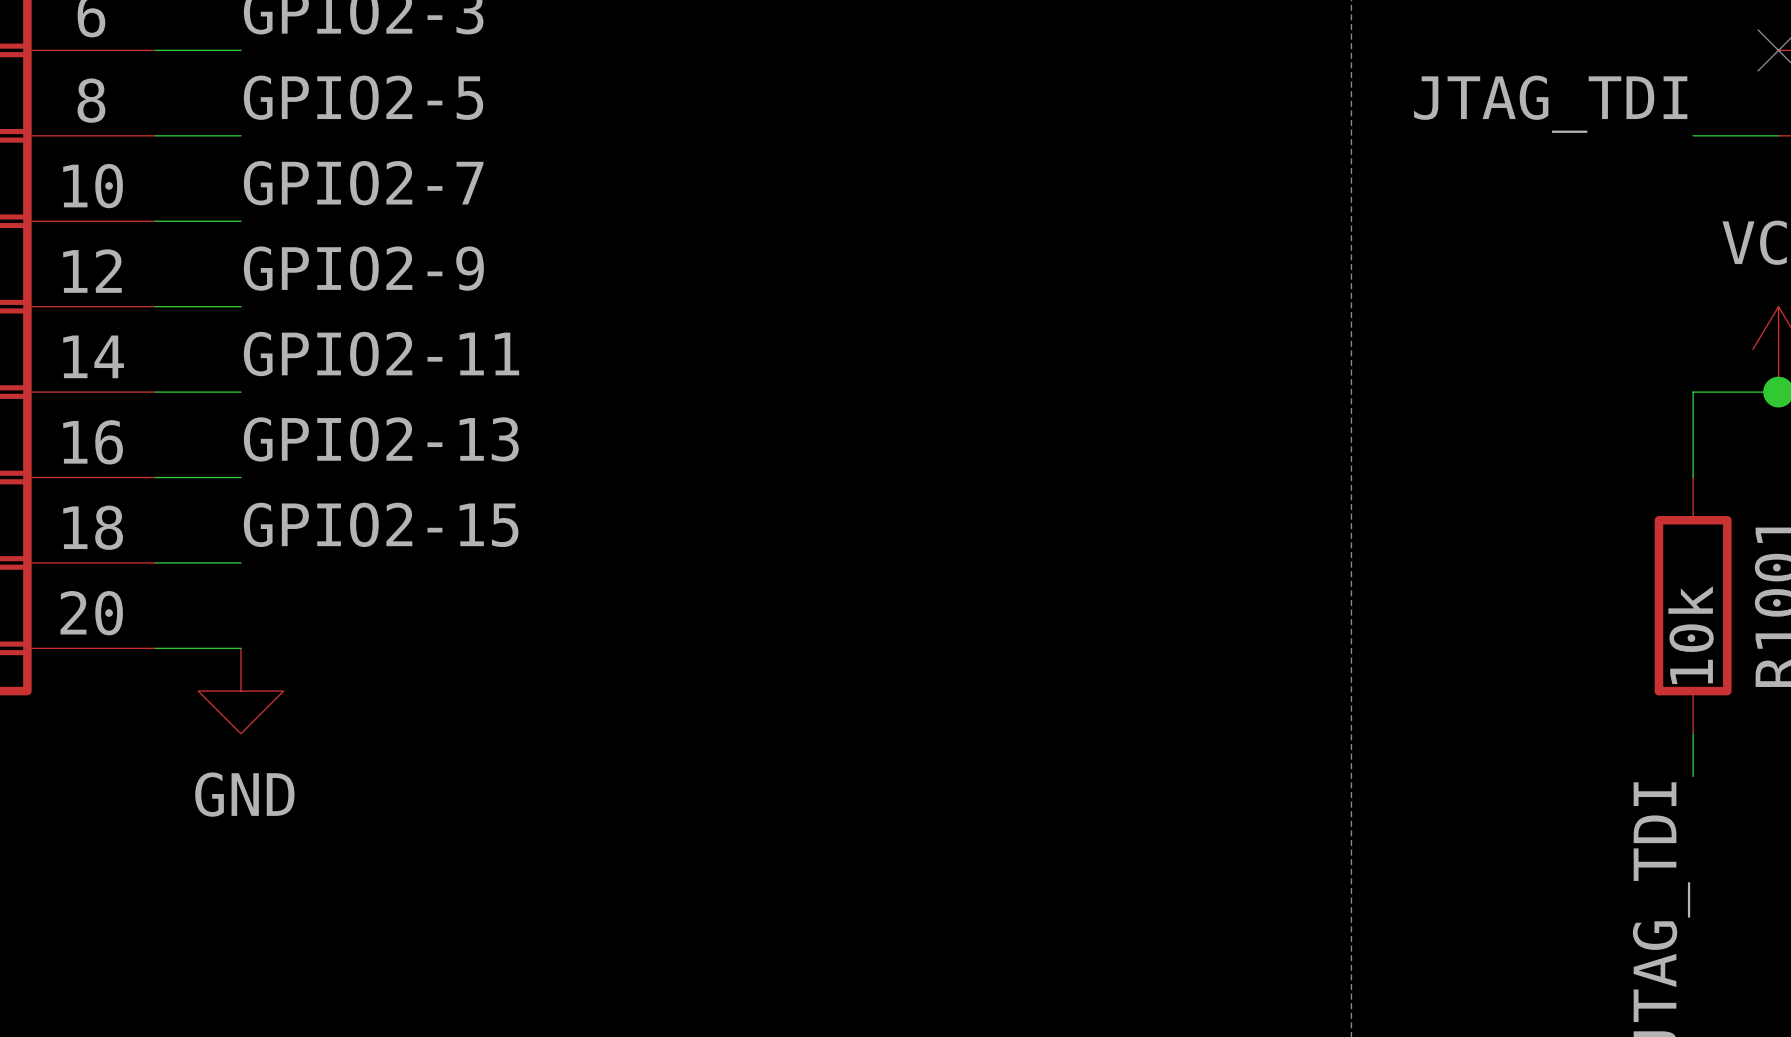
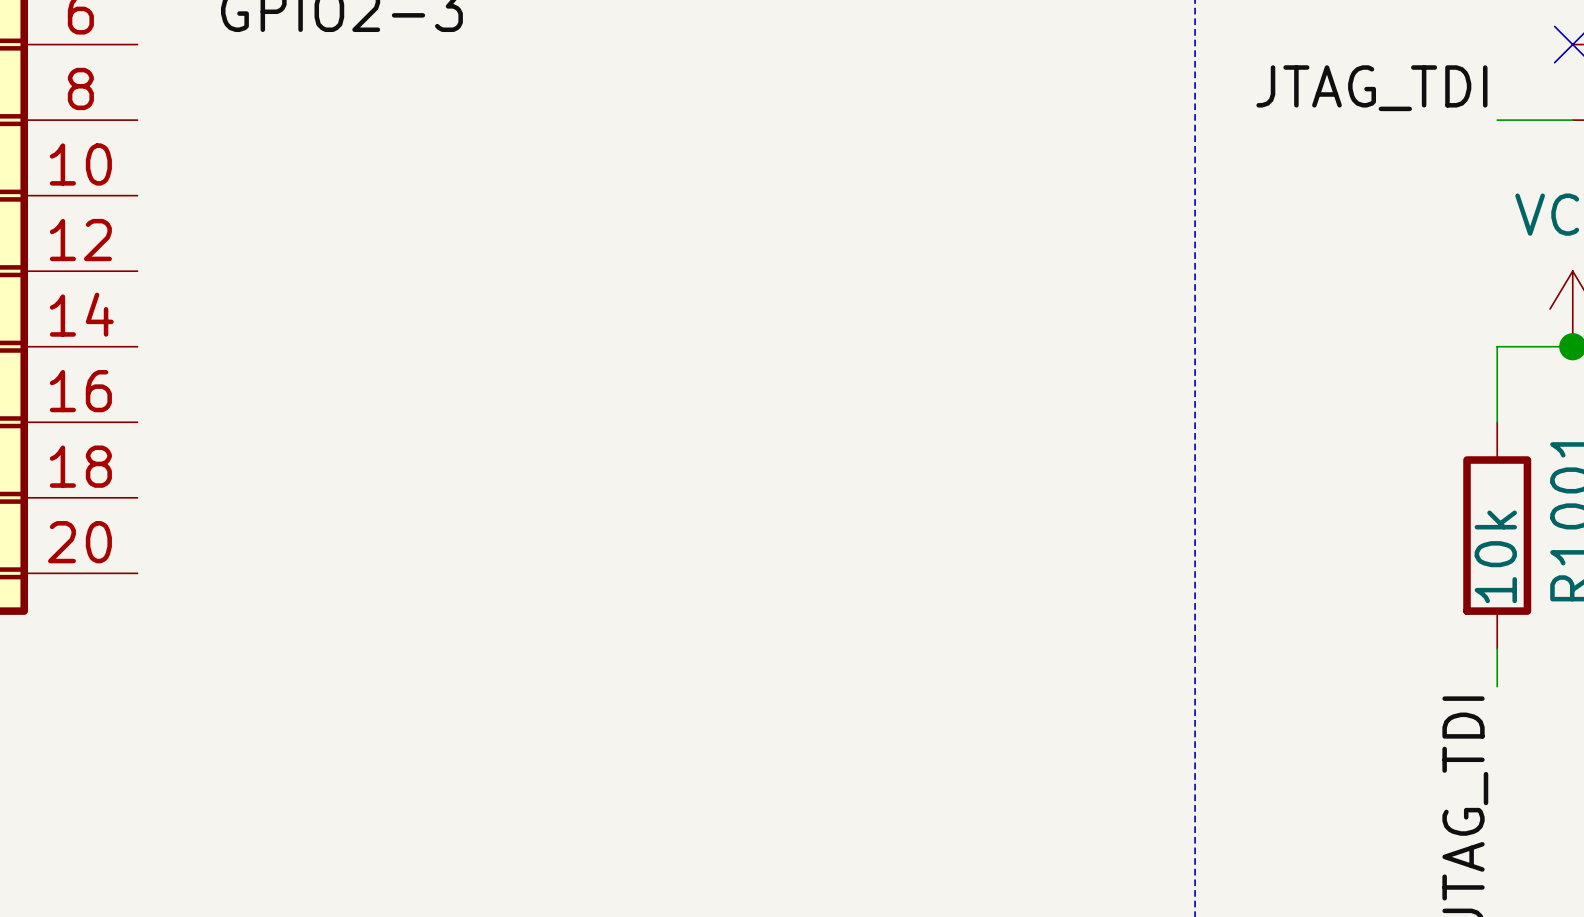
wire: (155, 50) (240, 50) -> none
label: GPIO2-5 (363, 97) -> none
wire: (155, 135) (240, 135) -> none
label: GPIO2-7 (363, 183) -> none
wire: (155, 221) (240, 221) -> none
label: GPIO2-9 (363, 268) -> none
wire: (155, 306) (240, 306) -> none
label: GPIO2-11 (381, 354) -> none
wire: (155, 392) (240, 392) -> none
label: GPIO2-13 (381, 439) -> none
wire: (155, 477) (240, 477) -> none
label: GPIO2-15 (381, 524) -> none
wire: (155, 562) (240, 562) -> none
wire: (155, 648) (240, 648) -> none
power symbol: GND (240, 691) -> none

